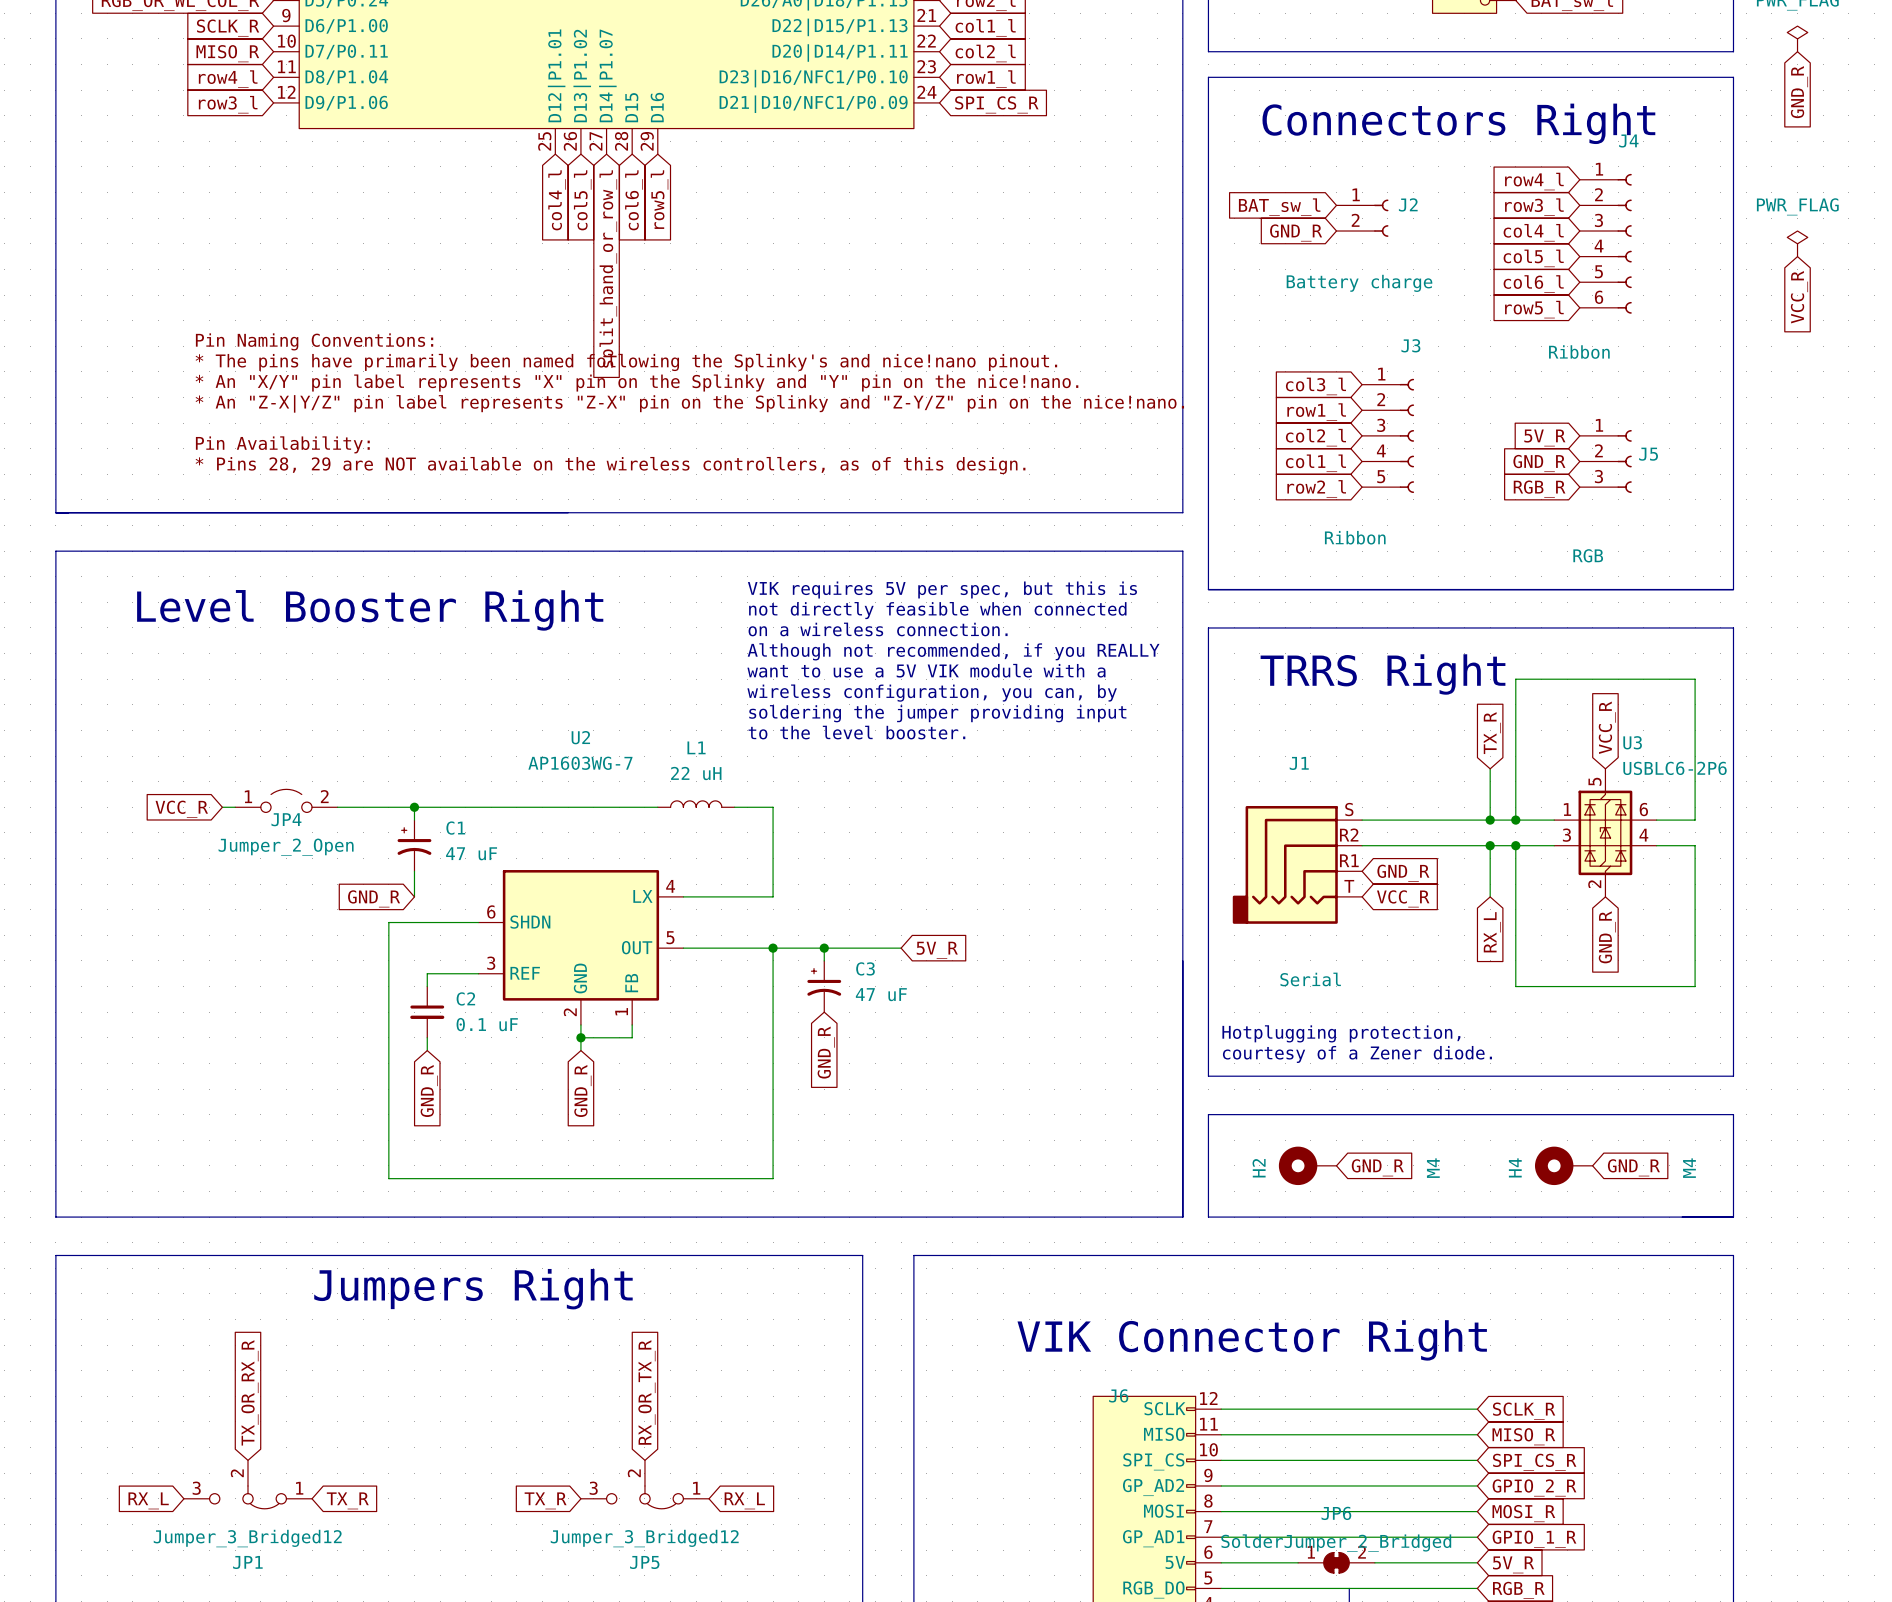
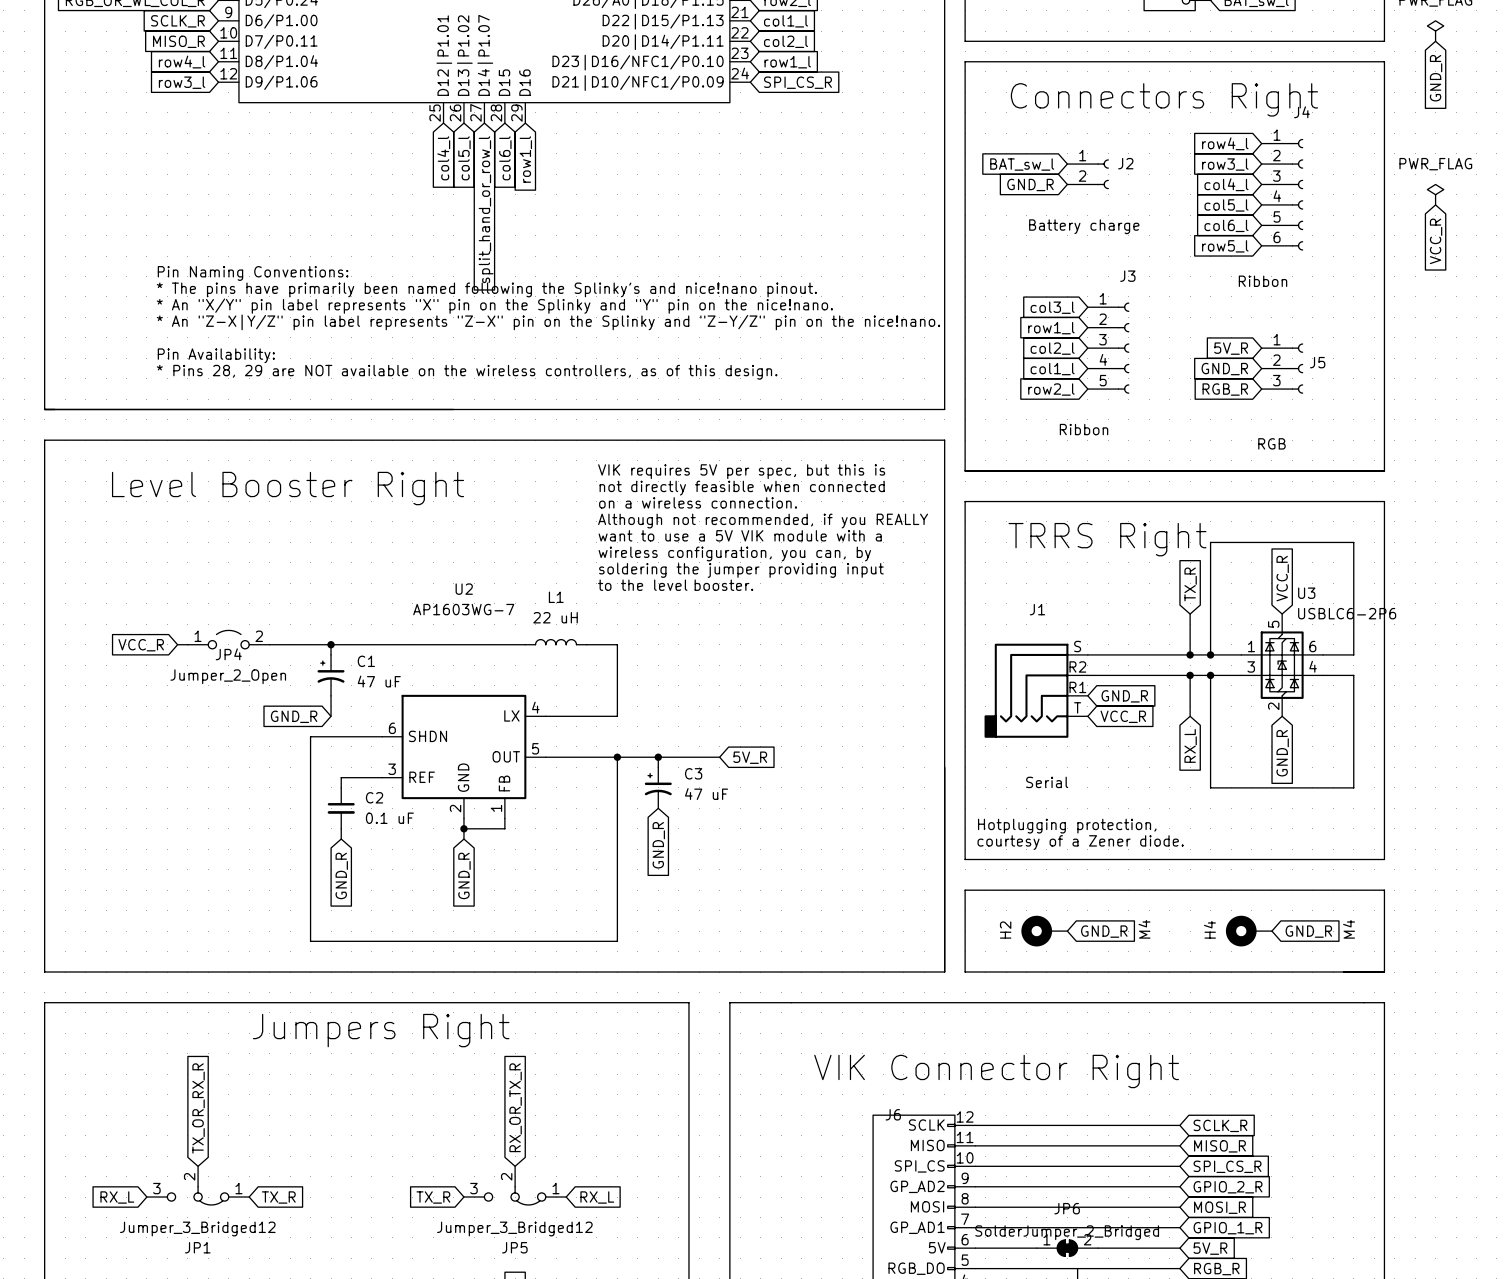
global label: row5_l (659, 199) -> row1_l (525, 159)

